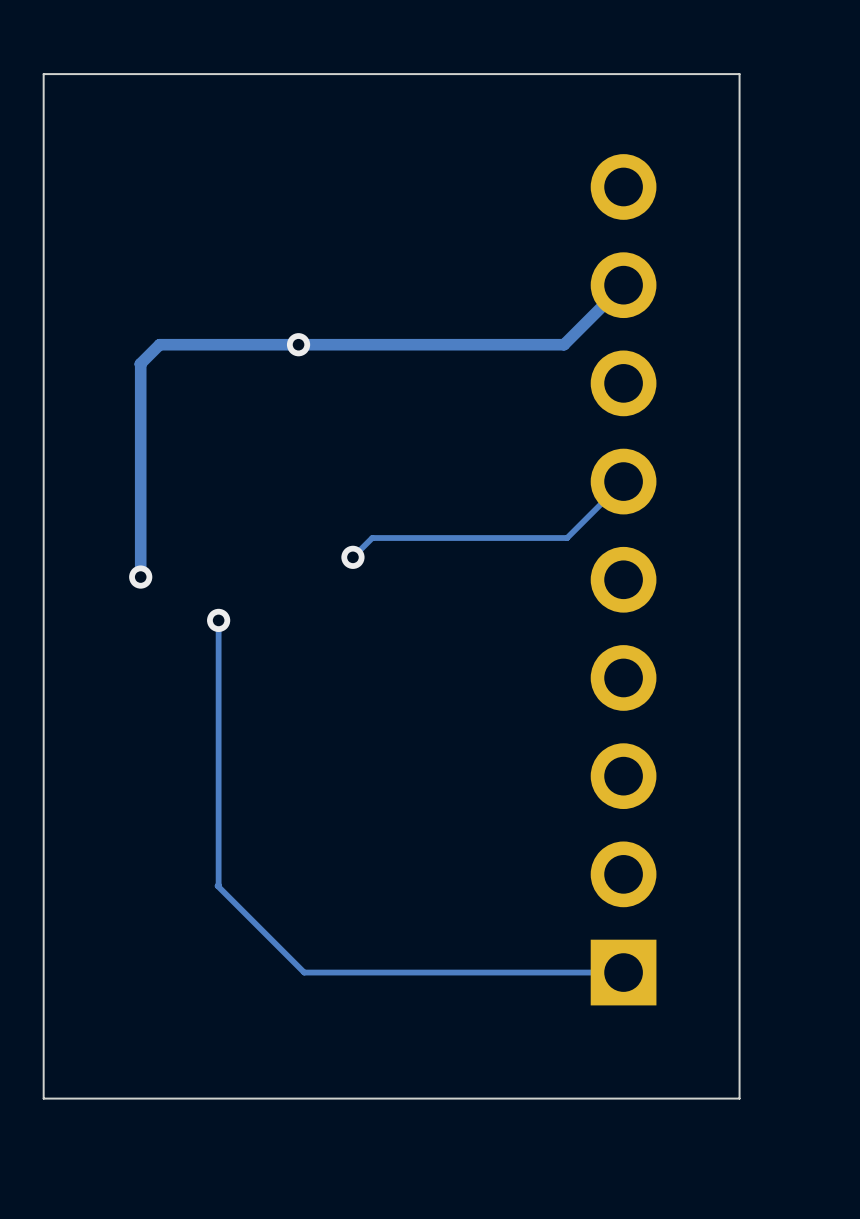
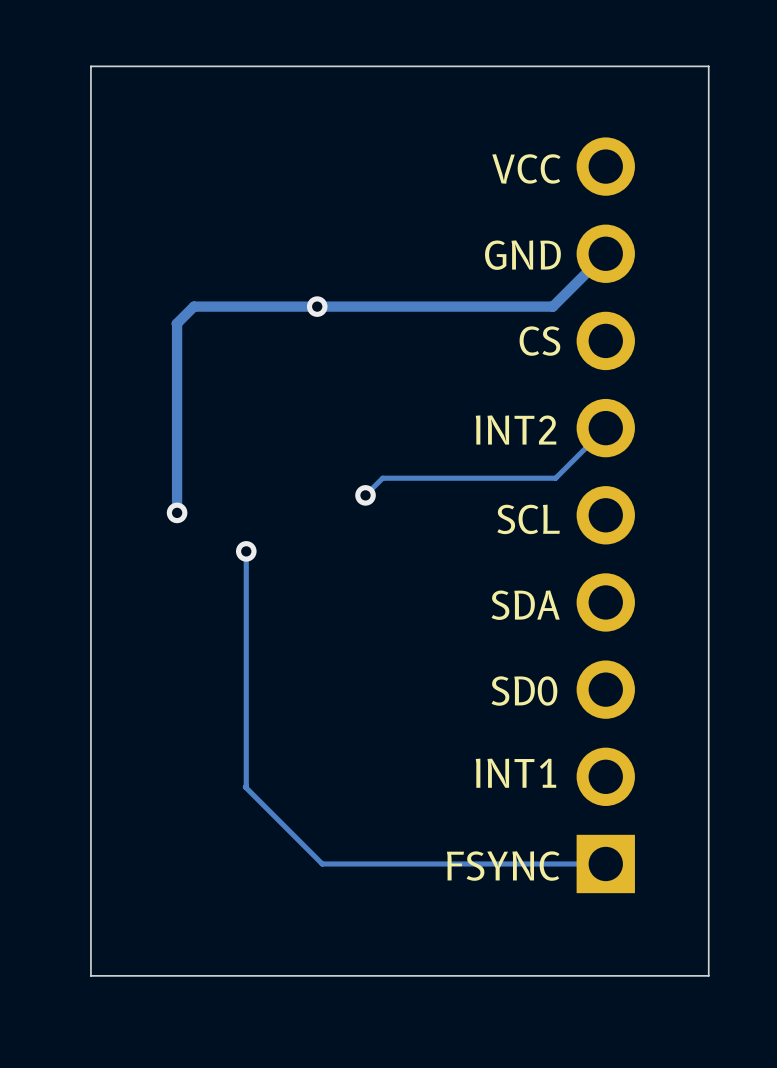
text: none -> VCC (526, 168)
text: none -> GND (522, 255)
text: none -> CS (539, 341)
text: none -> INT2 (516, 430)
text: none -> SCL (528, 519)
text: none -> SDA (525, 605)
text: none -> SD0 (524, 691)
text: none -> INT1 (515, 773)
text: none -> FSYNC (503, 866)

